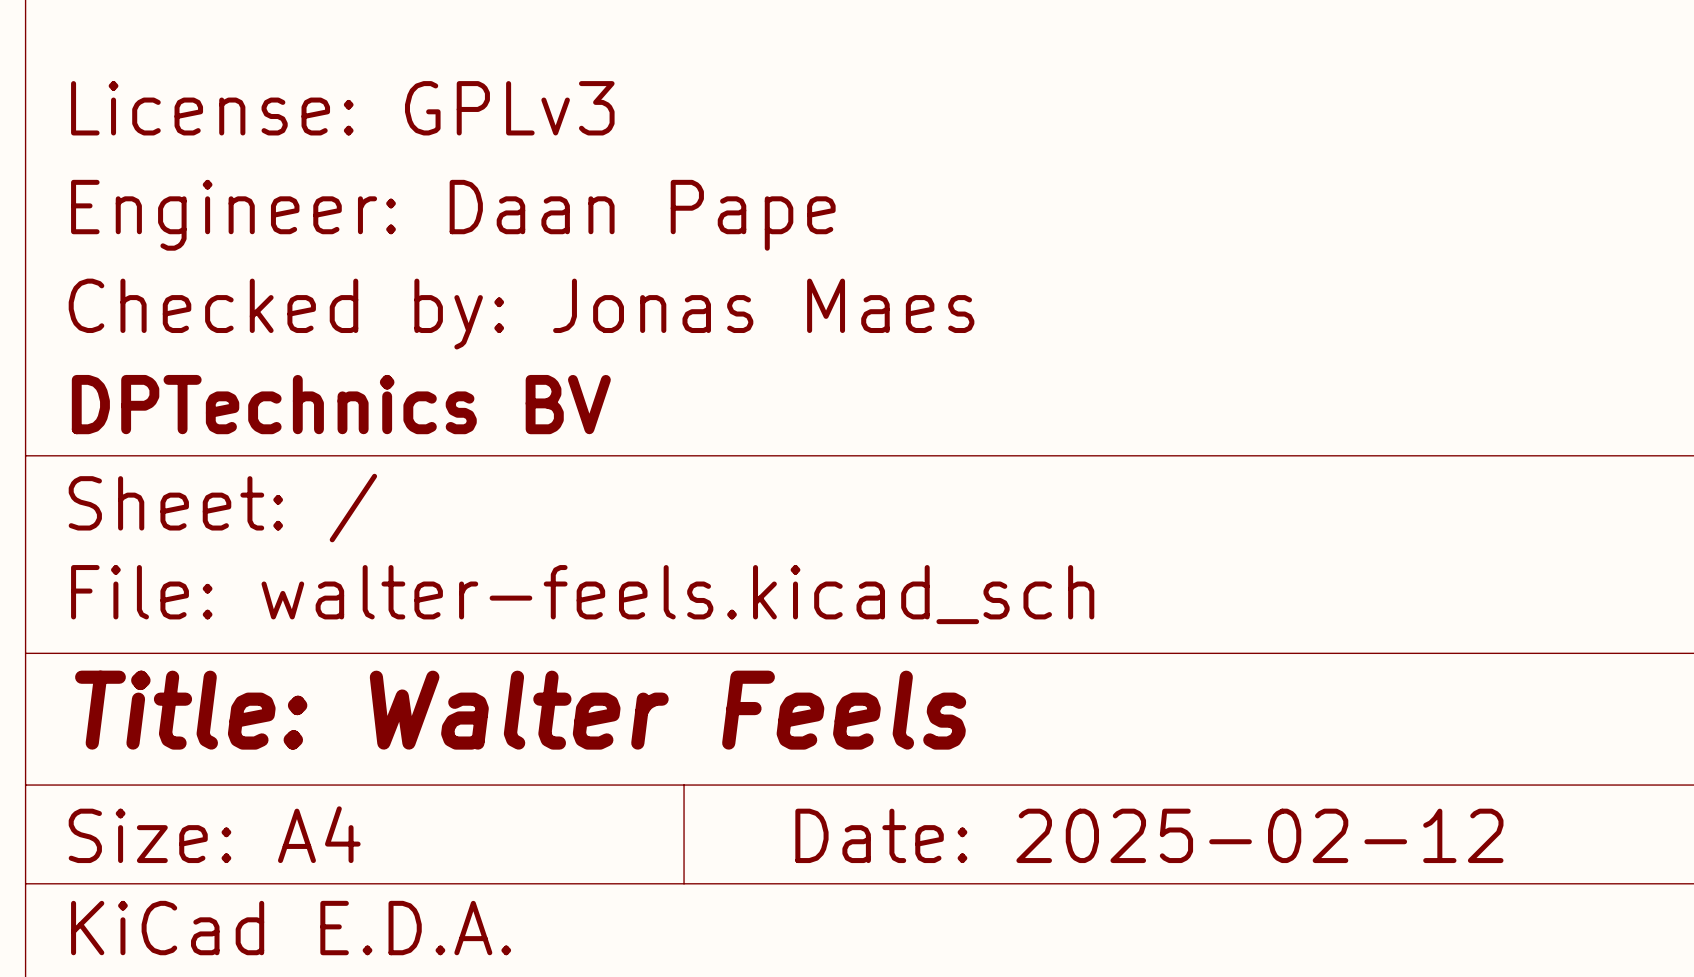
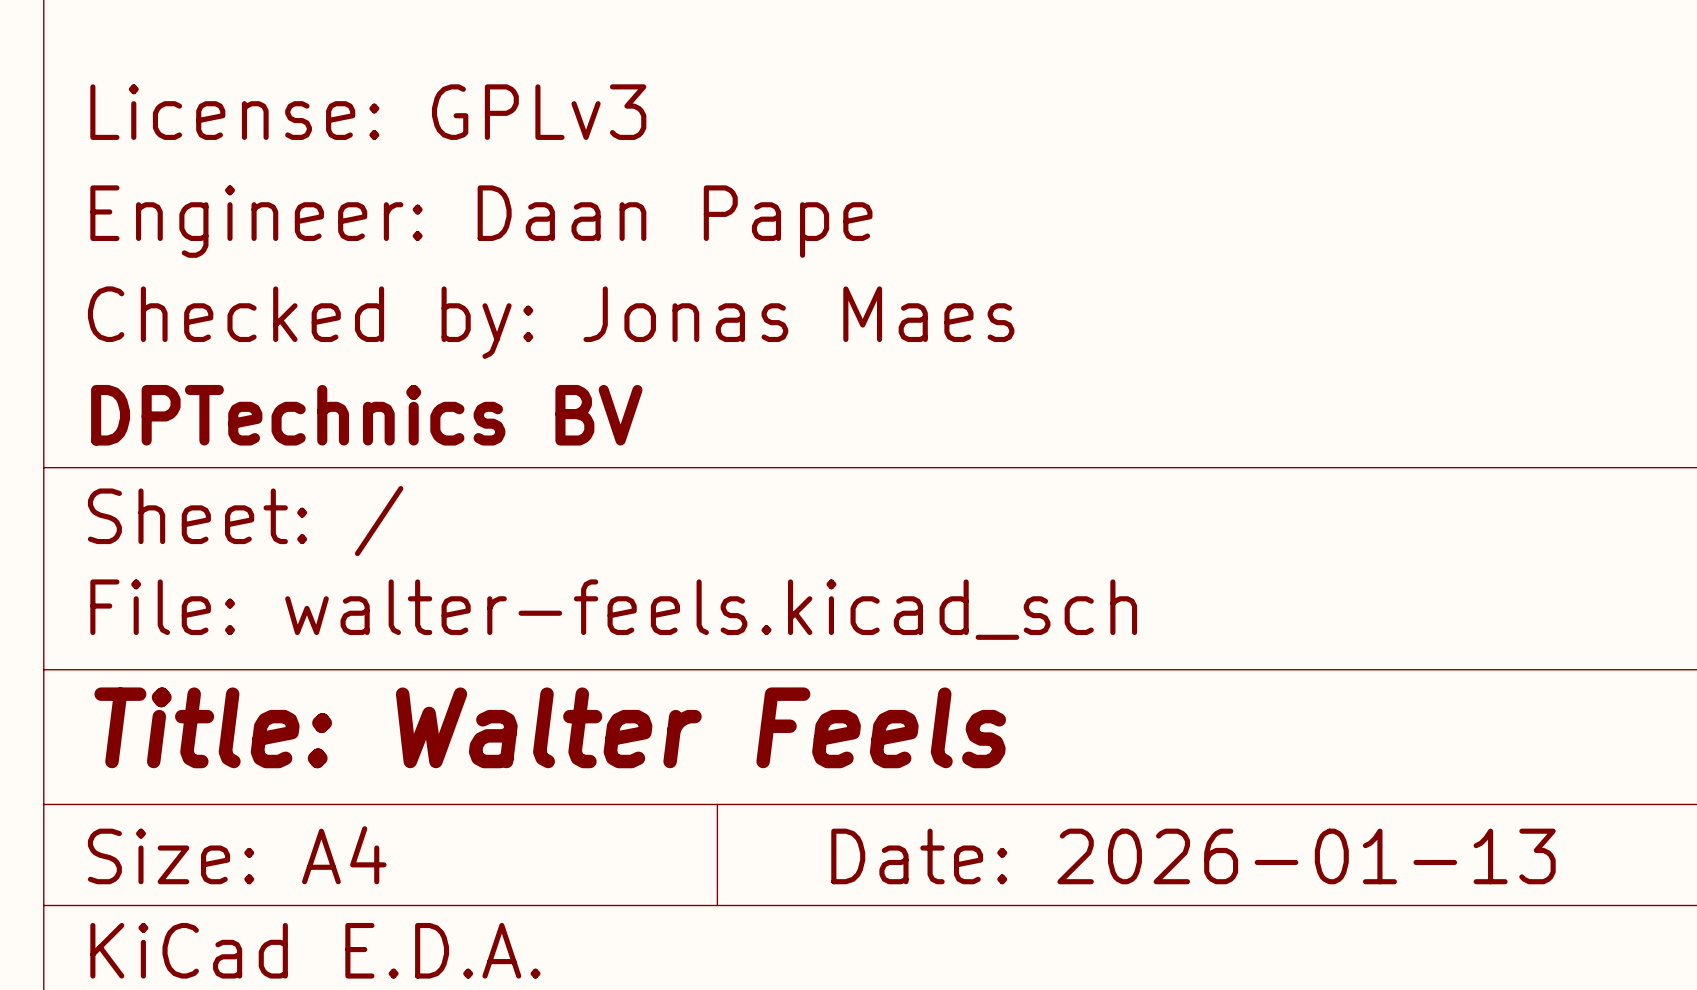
title block: Date: 2025-02-12 (1149, 835) -> Date: 2026-01-13 (1193, 856)

